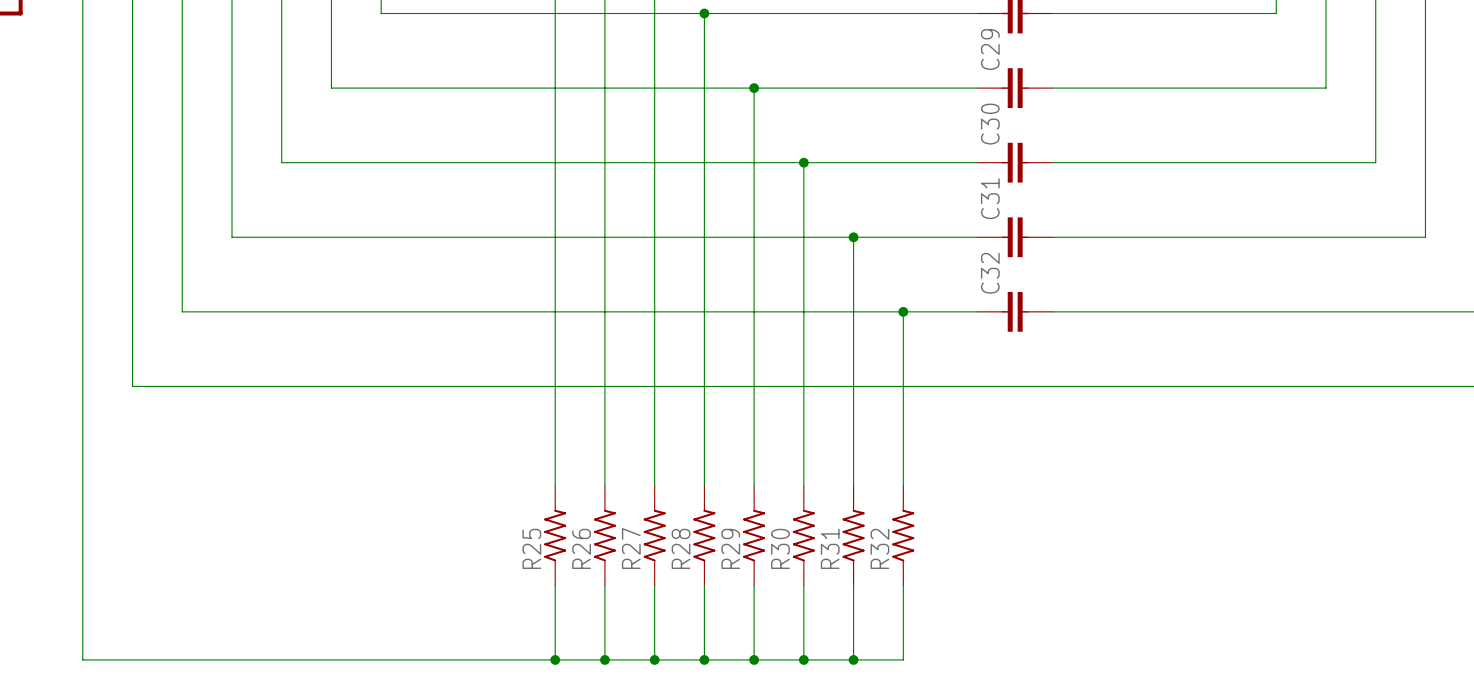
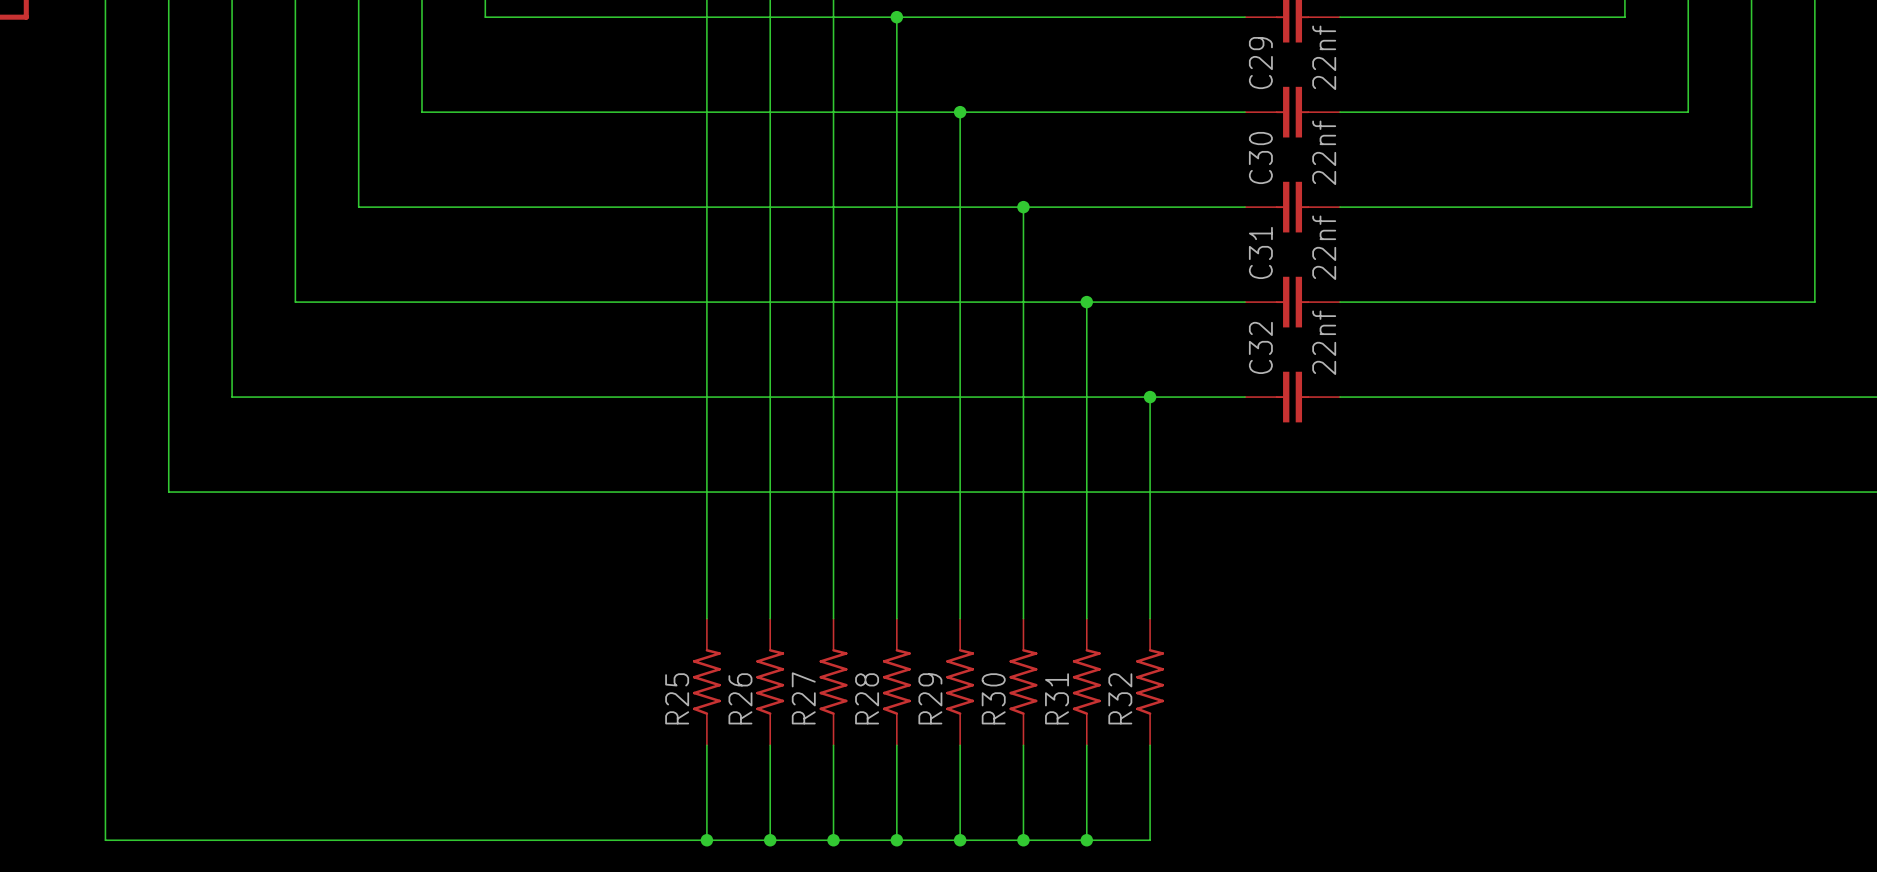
C29 value: none -> 22nf (1324, 57)
C30 value: none -> 22nf (1324, 152)
C31 value: none -> 22nf (1324, 247)
C32 value: none -> 22nf (1324, 342)

